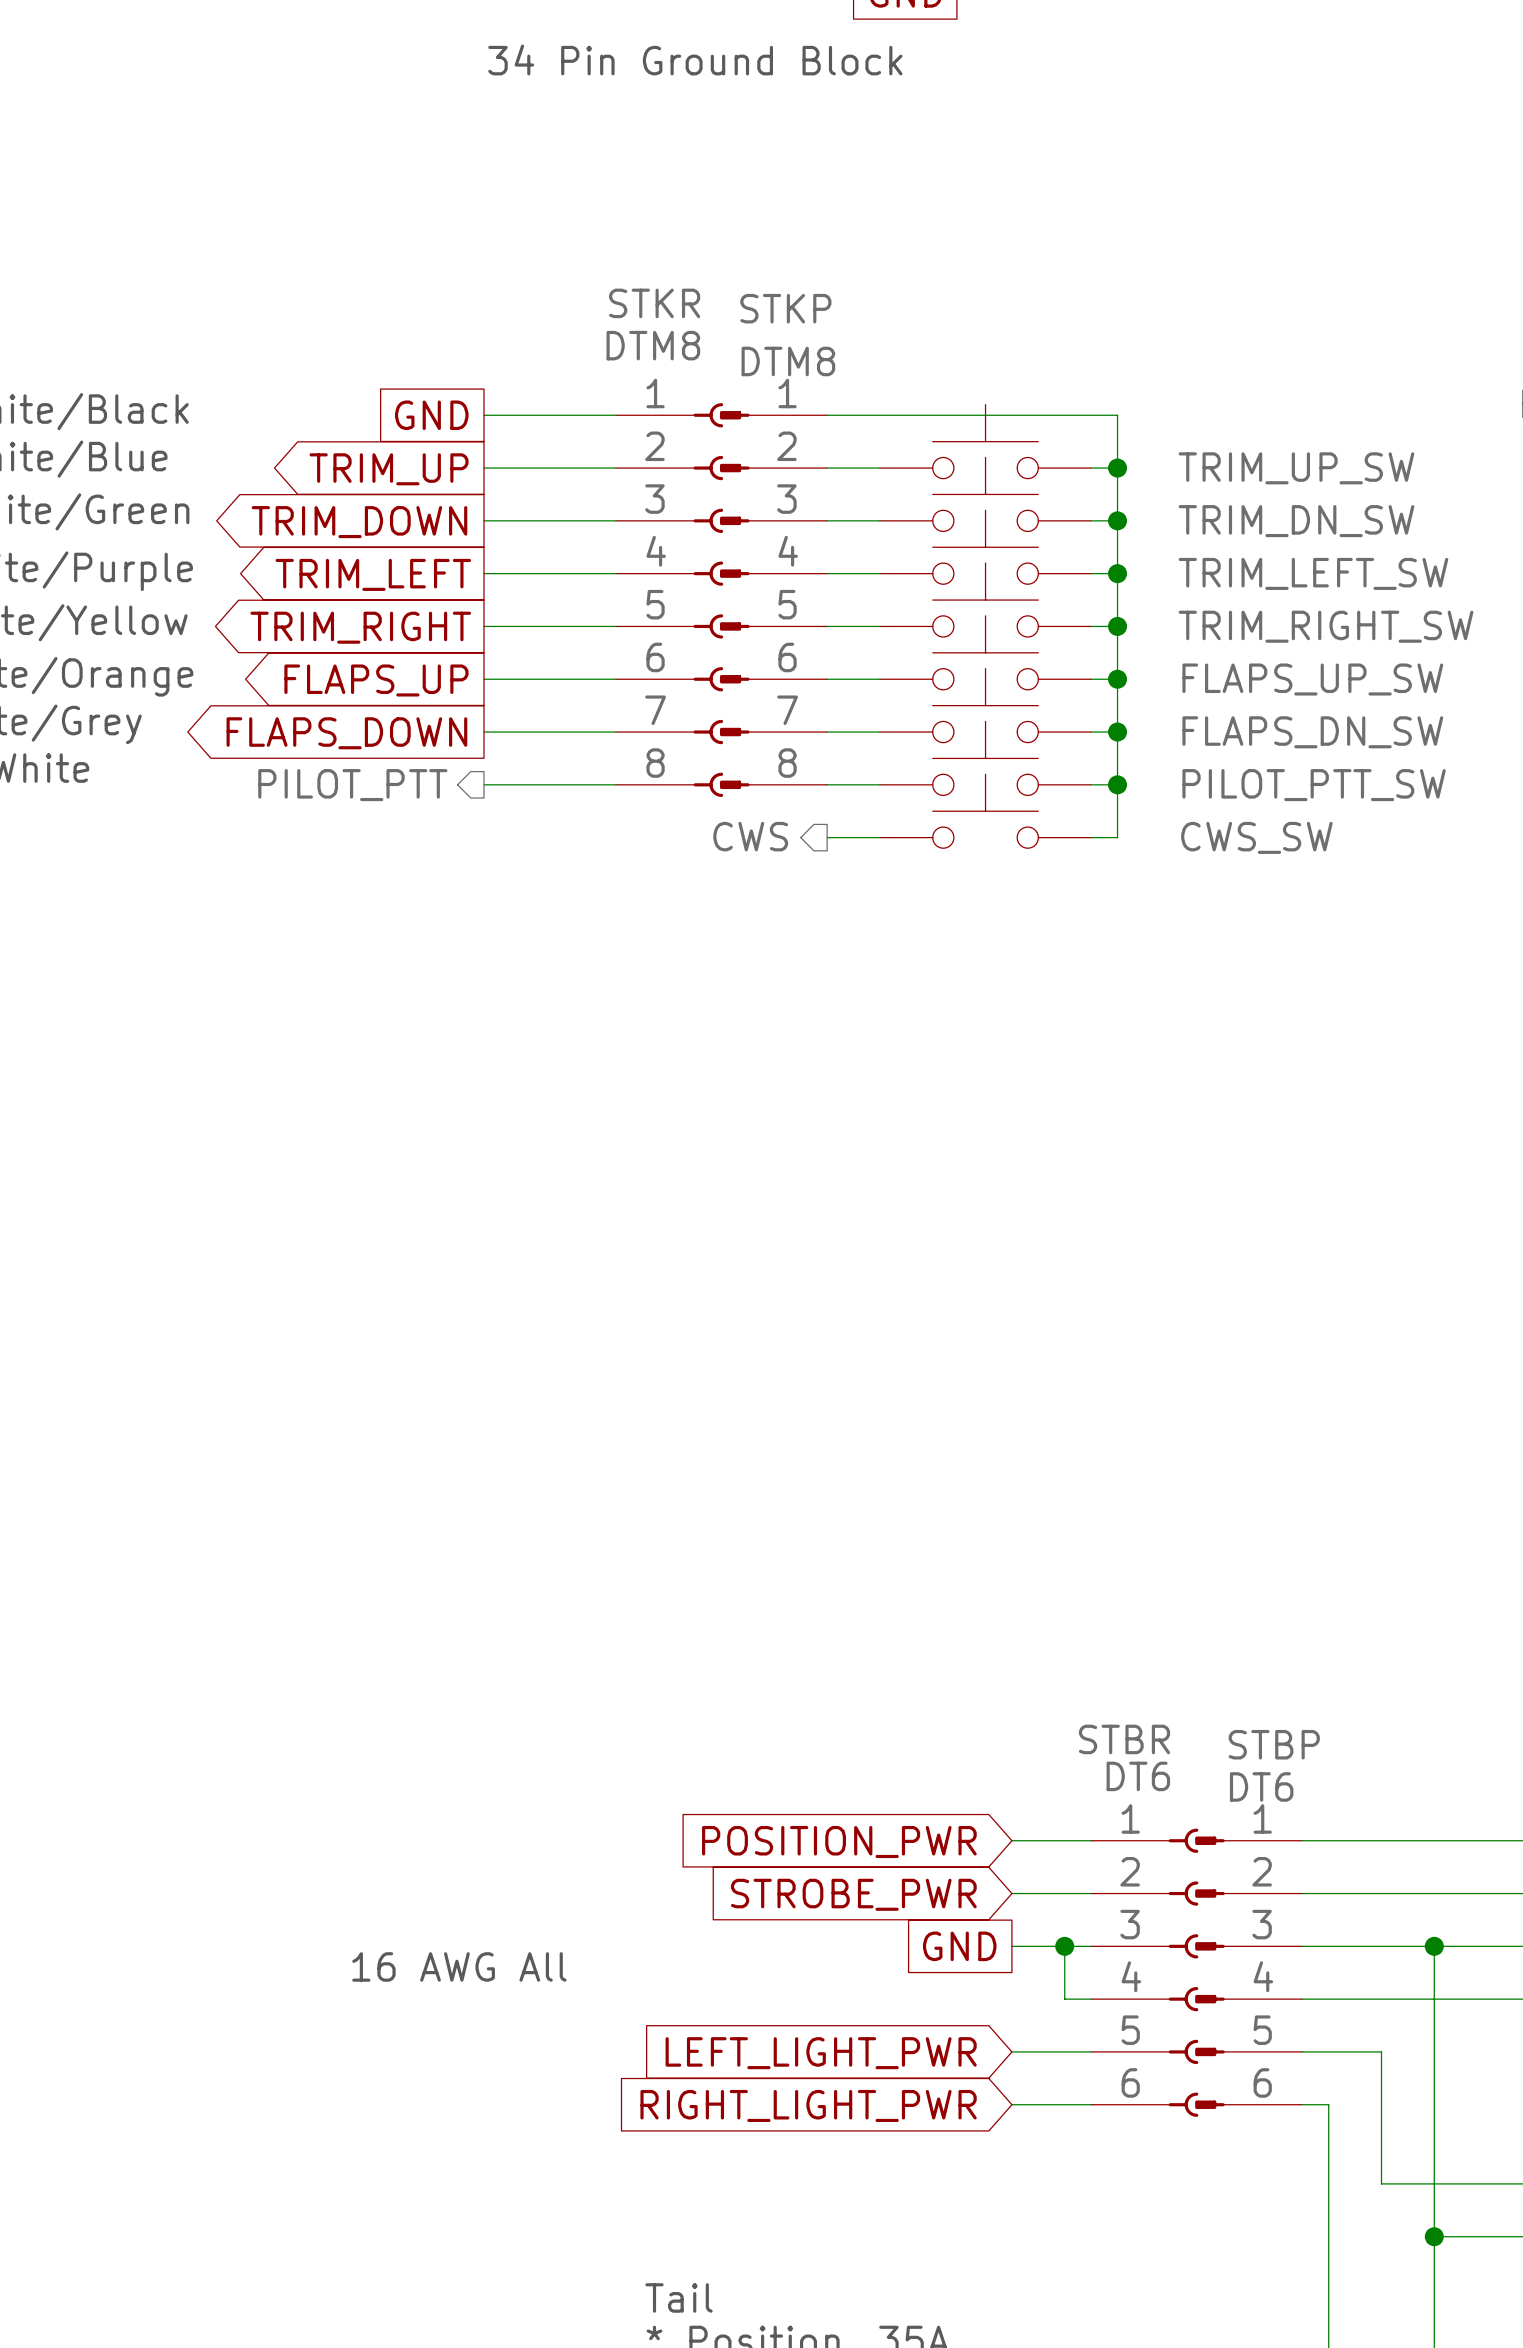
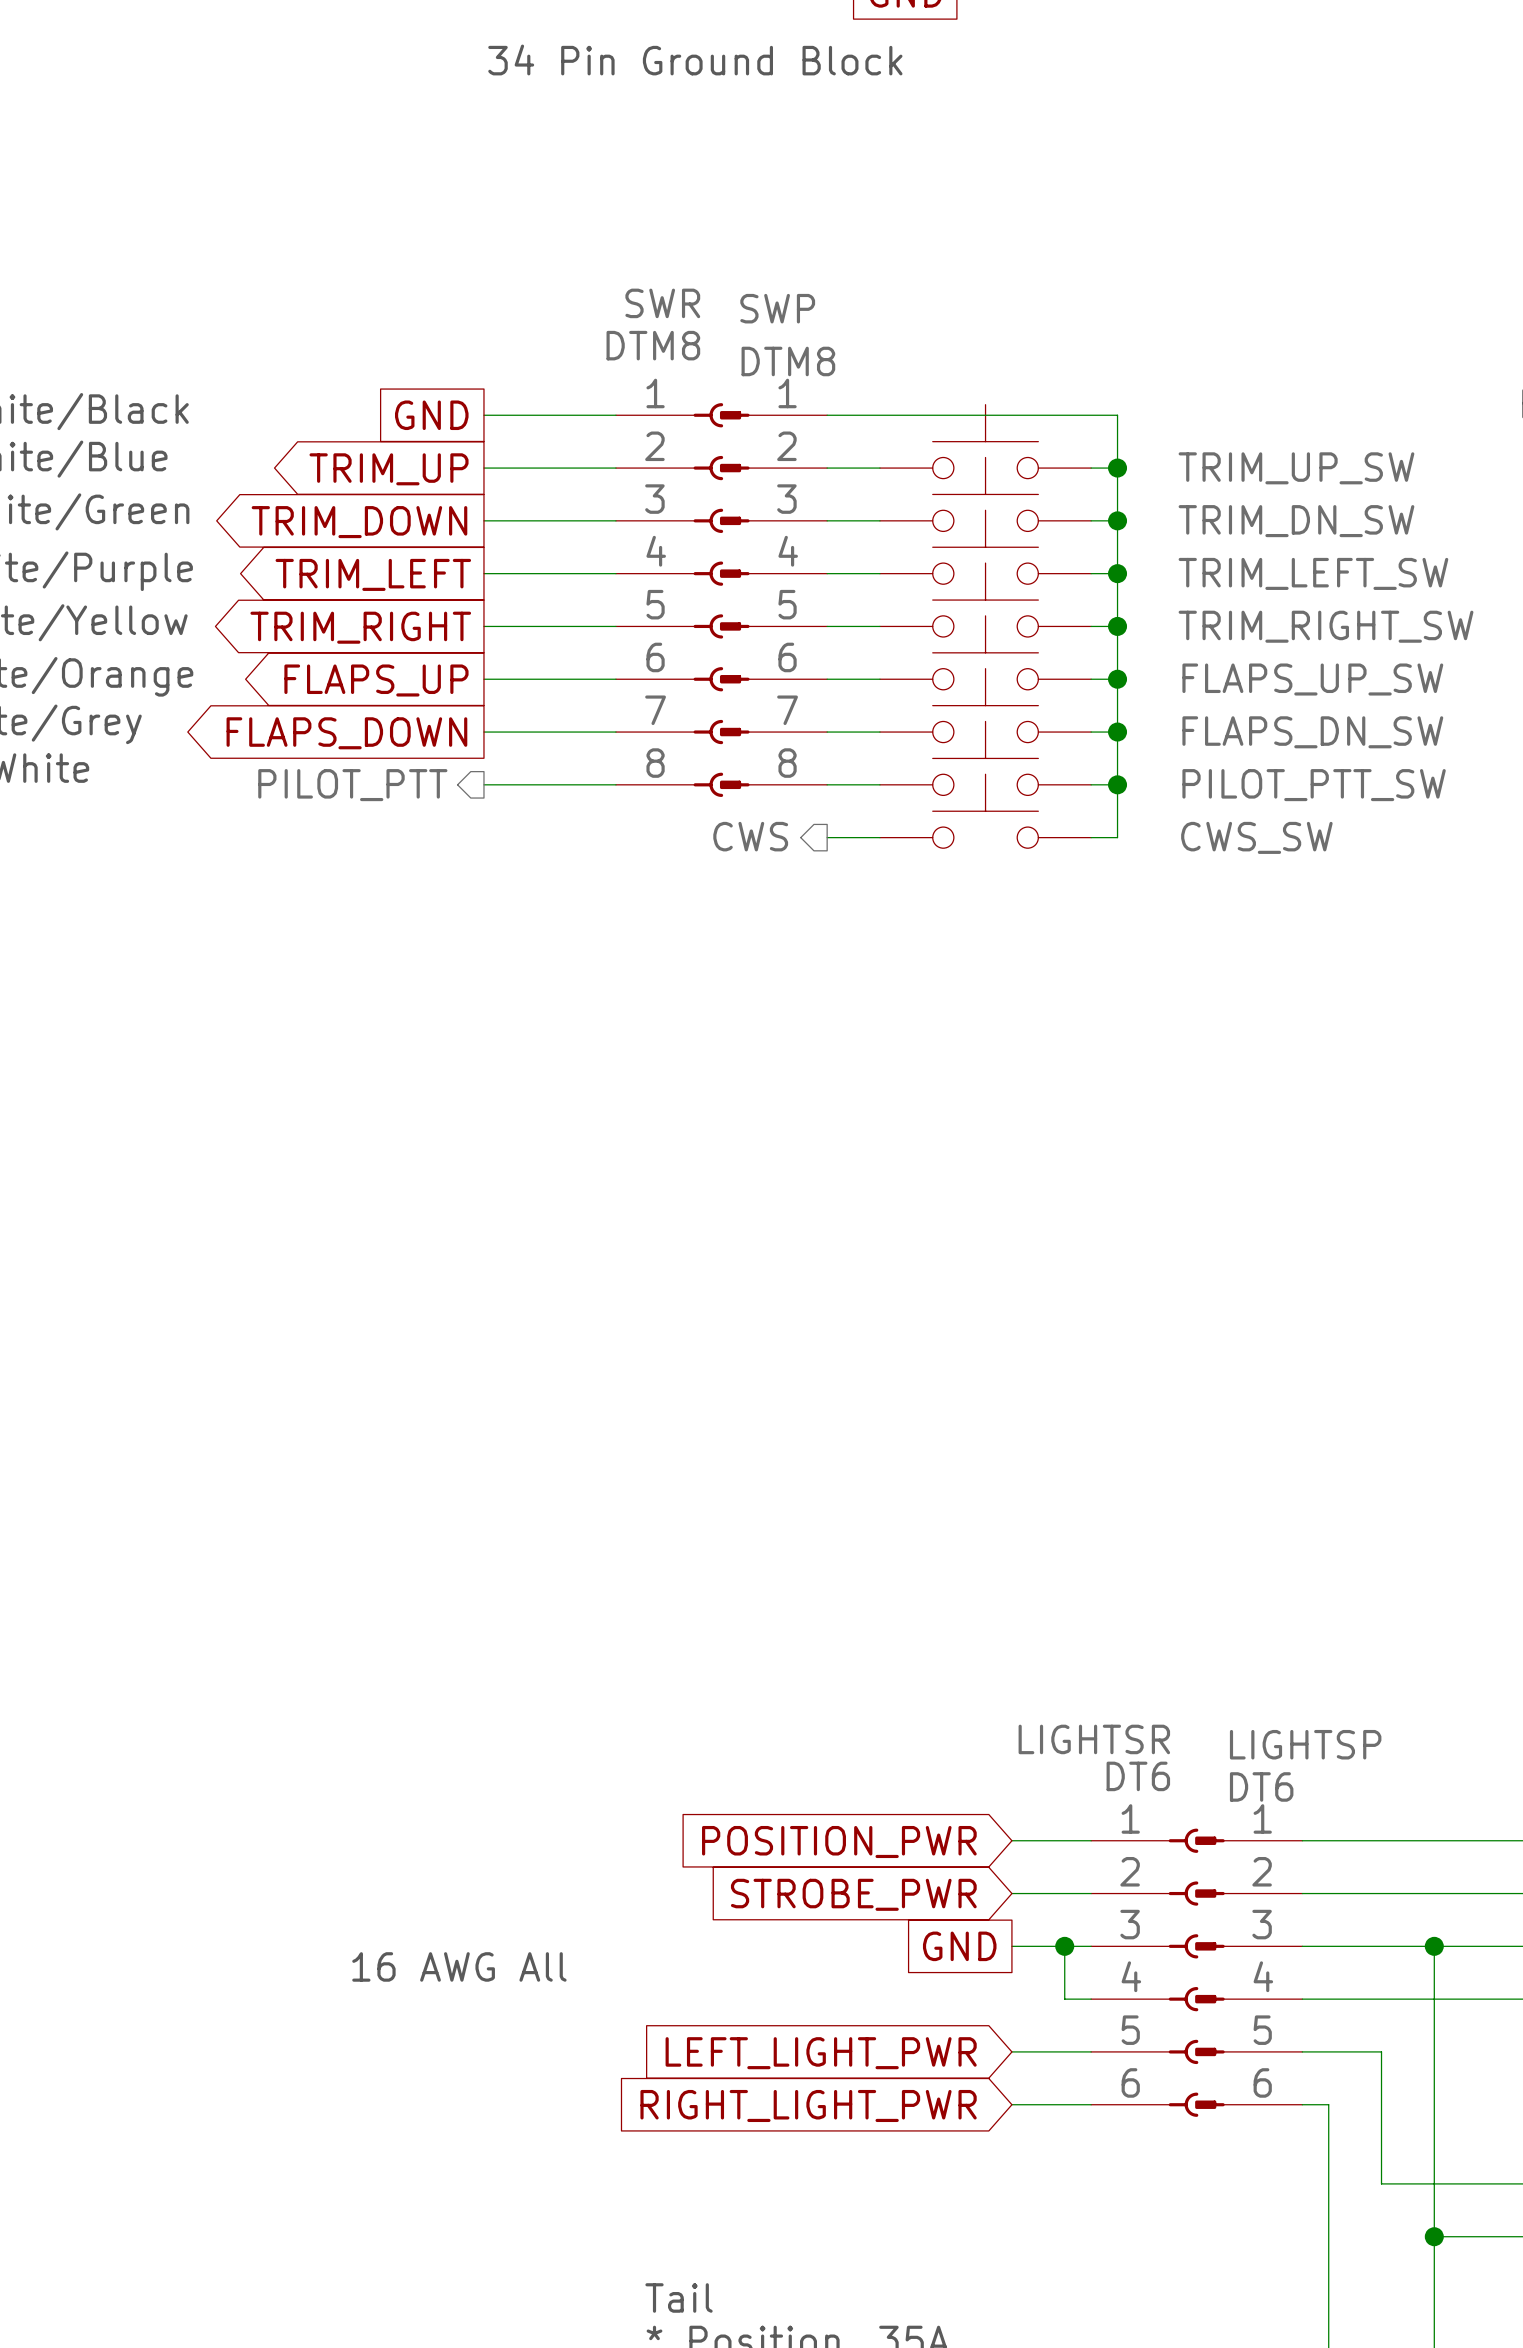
STKR name: STKR (654, 303) -> SWR (662, 303)
STKP name: STKP (785, 308) -> SWP (777, 308)
STBR name: STBR (1124, 1739) -> LIGHTSR (1094, 1739)
STBP name: STBP (1274, 1744) -> LIGHTSP (1305, 1744)

